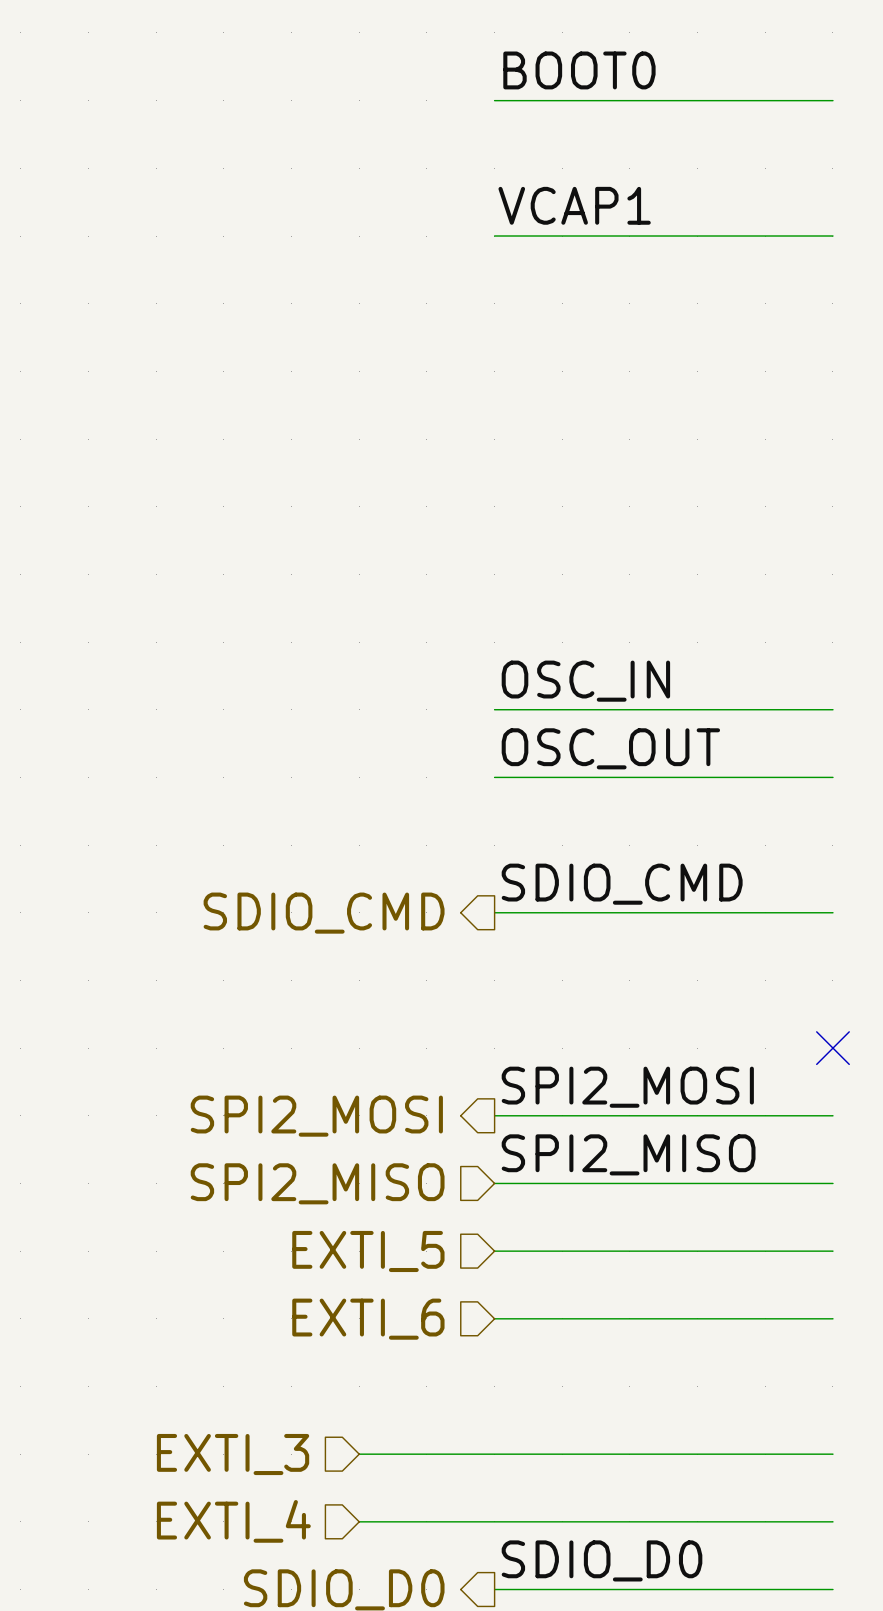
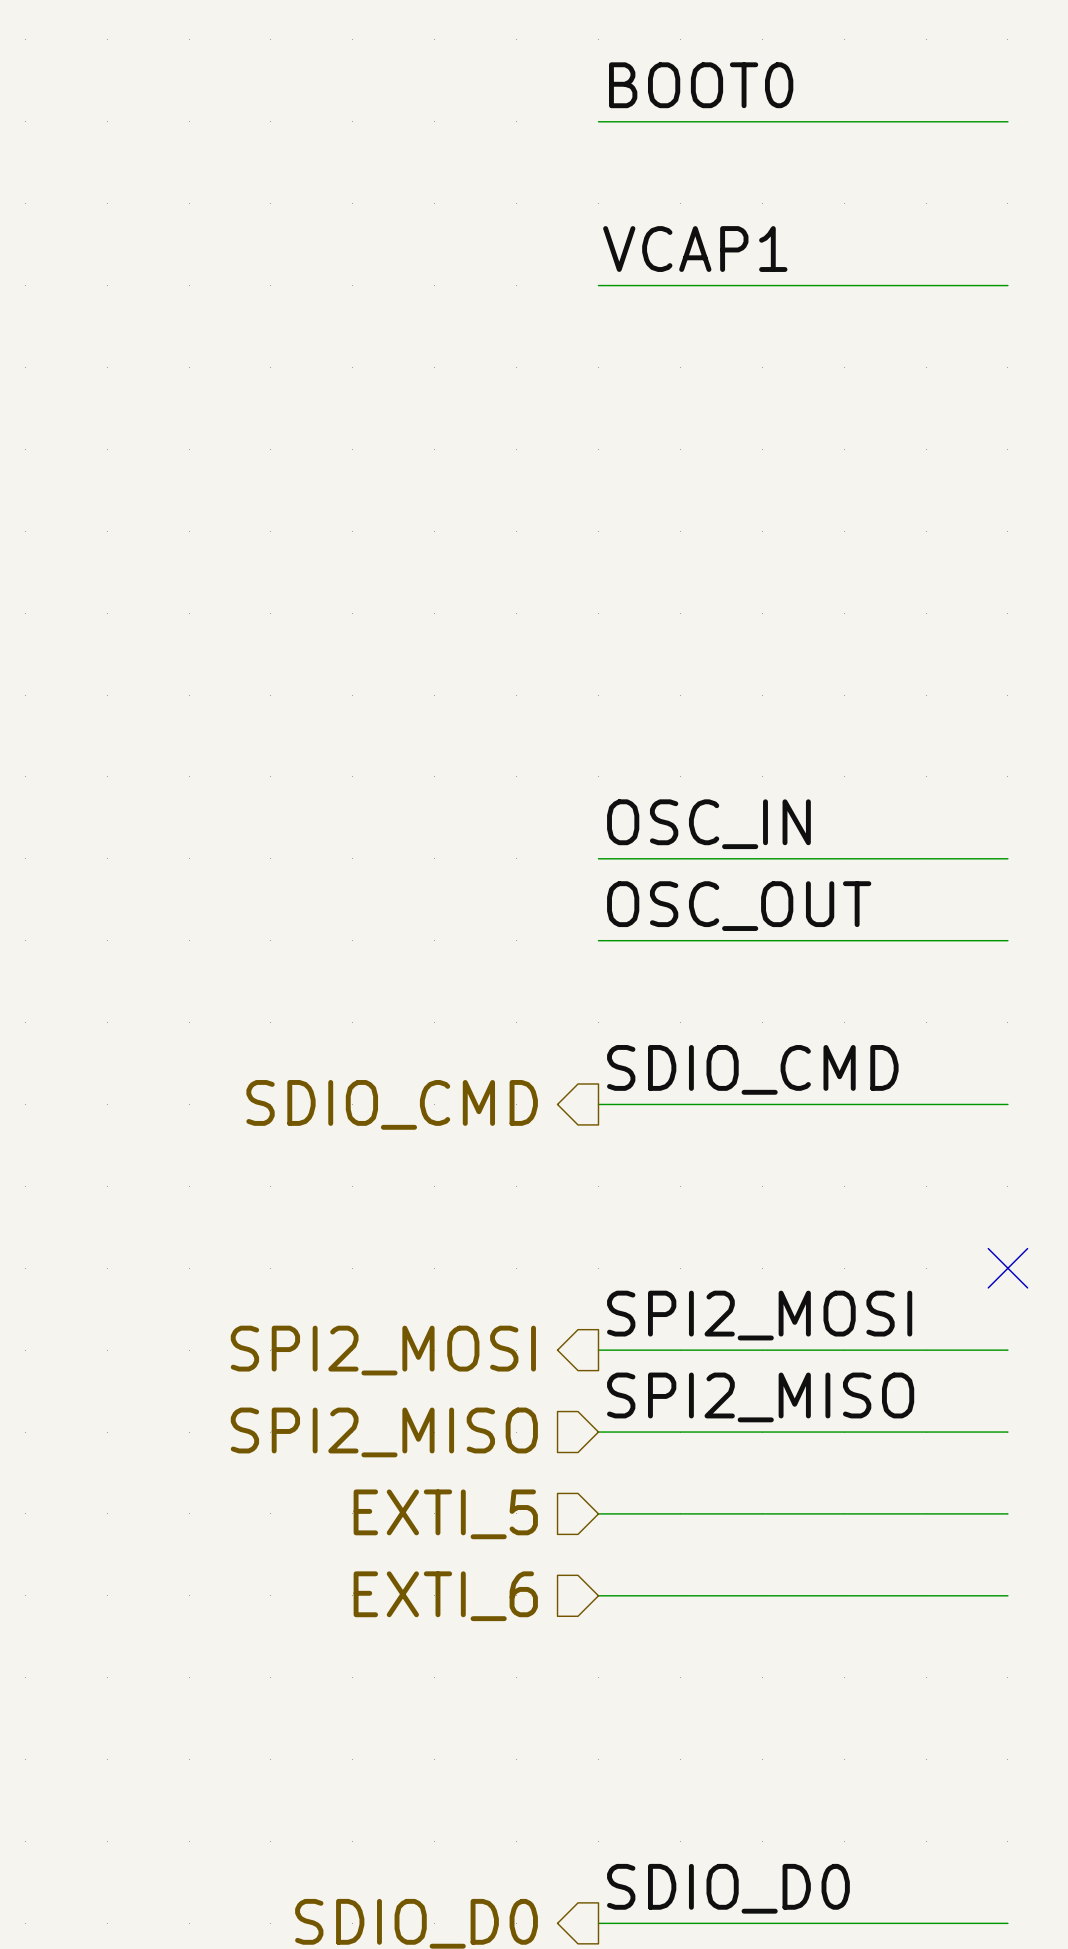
hierarchical label: EXTI_3 (233, 1454) -> none
wire: (359, 1454) (832, 1454) -> none
hierarchical label: EXTI_4 (233, 1521) -> none
wire: (359, 1521) (832, 1521) -> none

